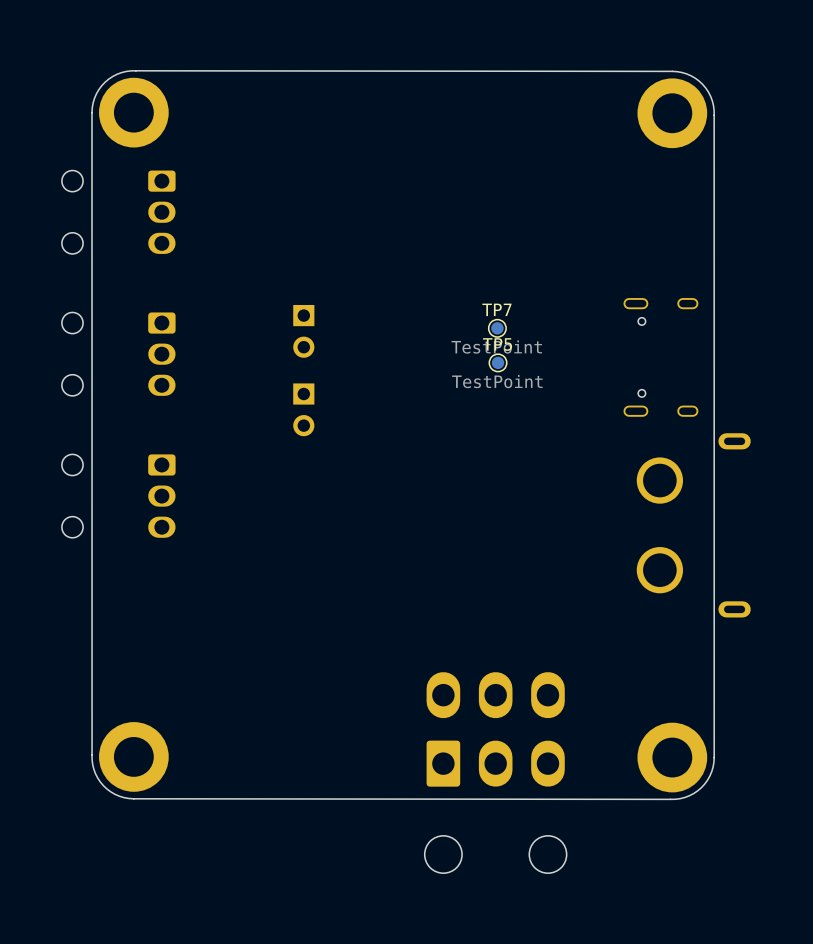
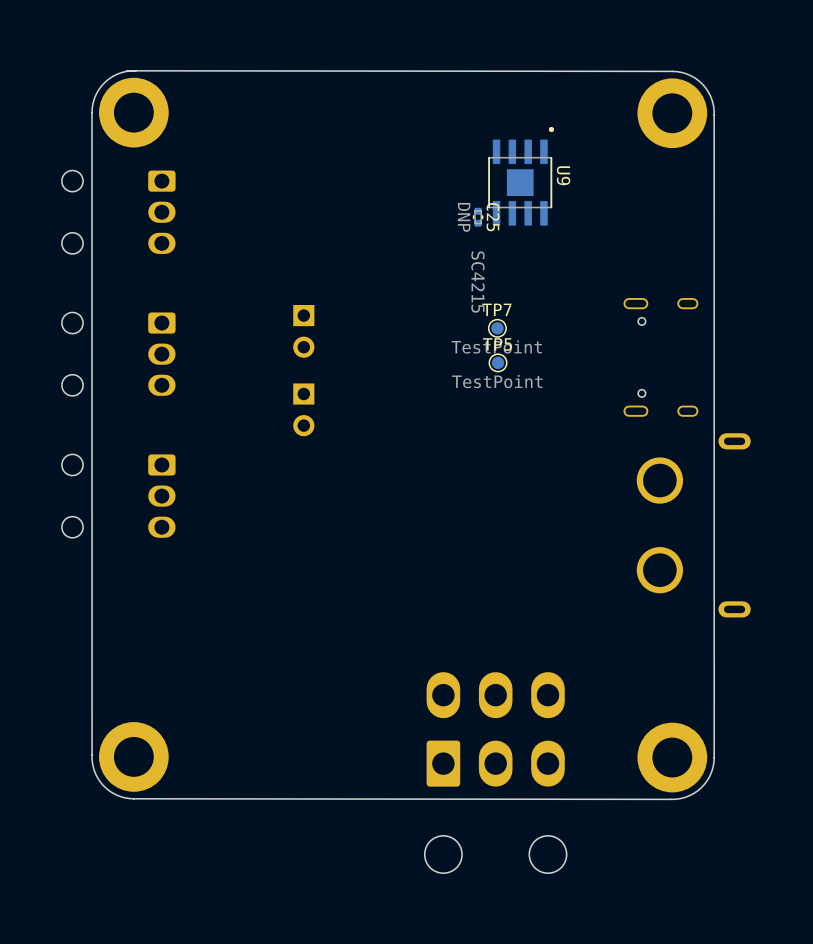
U9: none -> SC4215 (521, 176)
C25: none -> DNP (478, 217)

